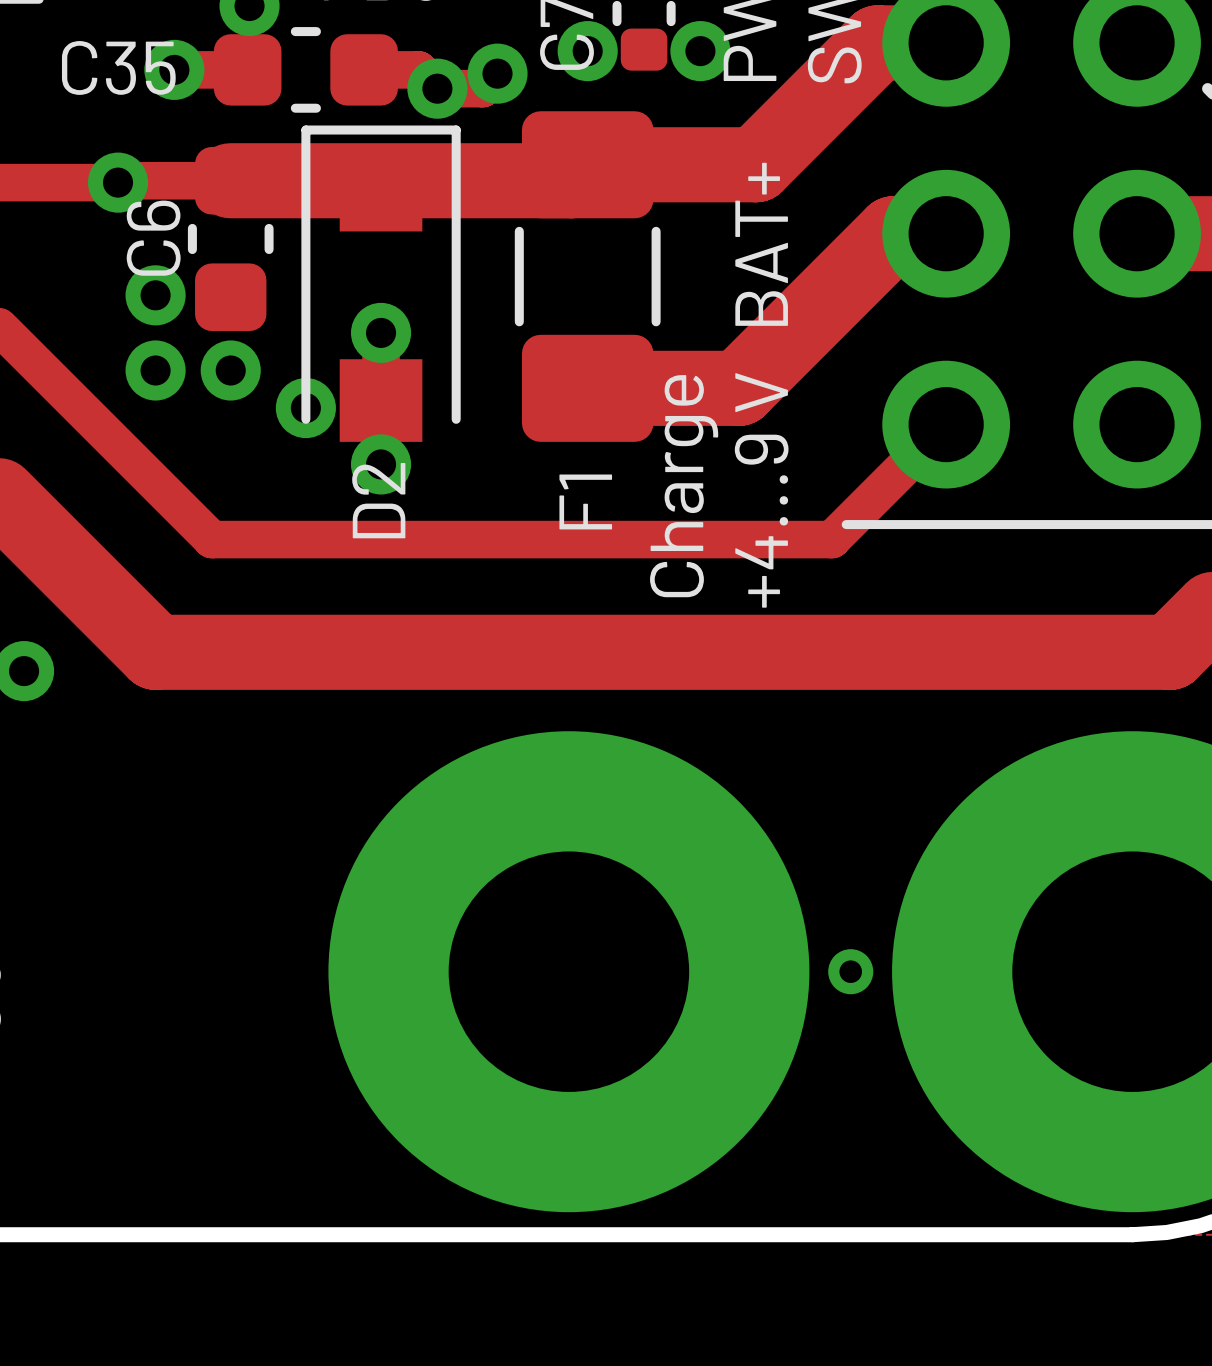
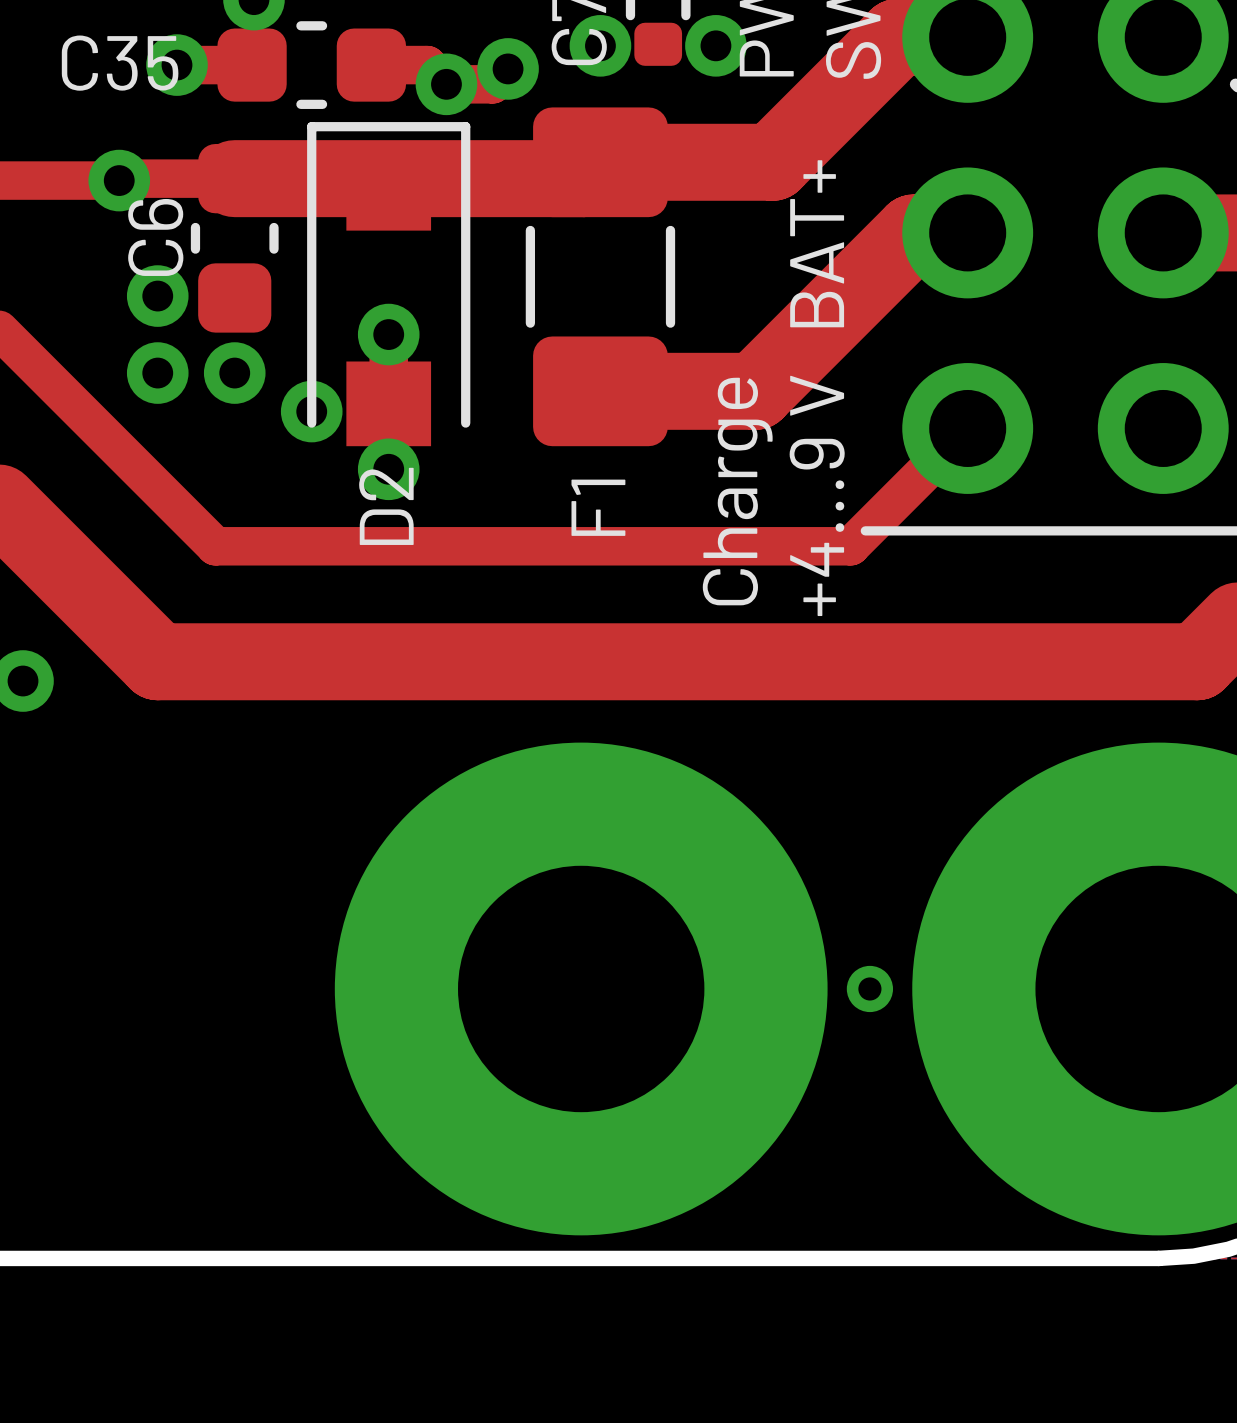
text position: BAT+ (761, 244) -> BAT+ (817, 243)
text position: Charge (684, 486) -> Charge (737, 491)
text position: +4...9 V (761, 490) -> +4...9 V (817, 495)

